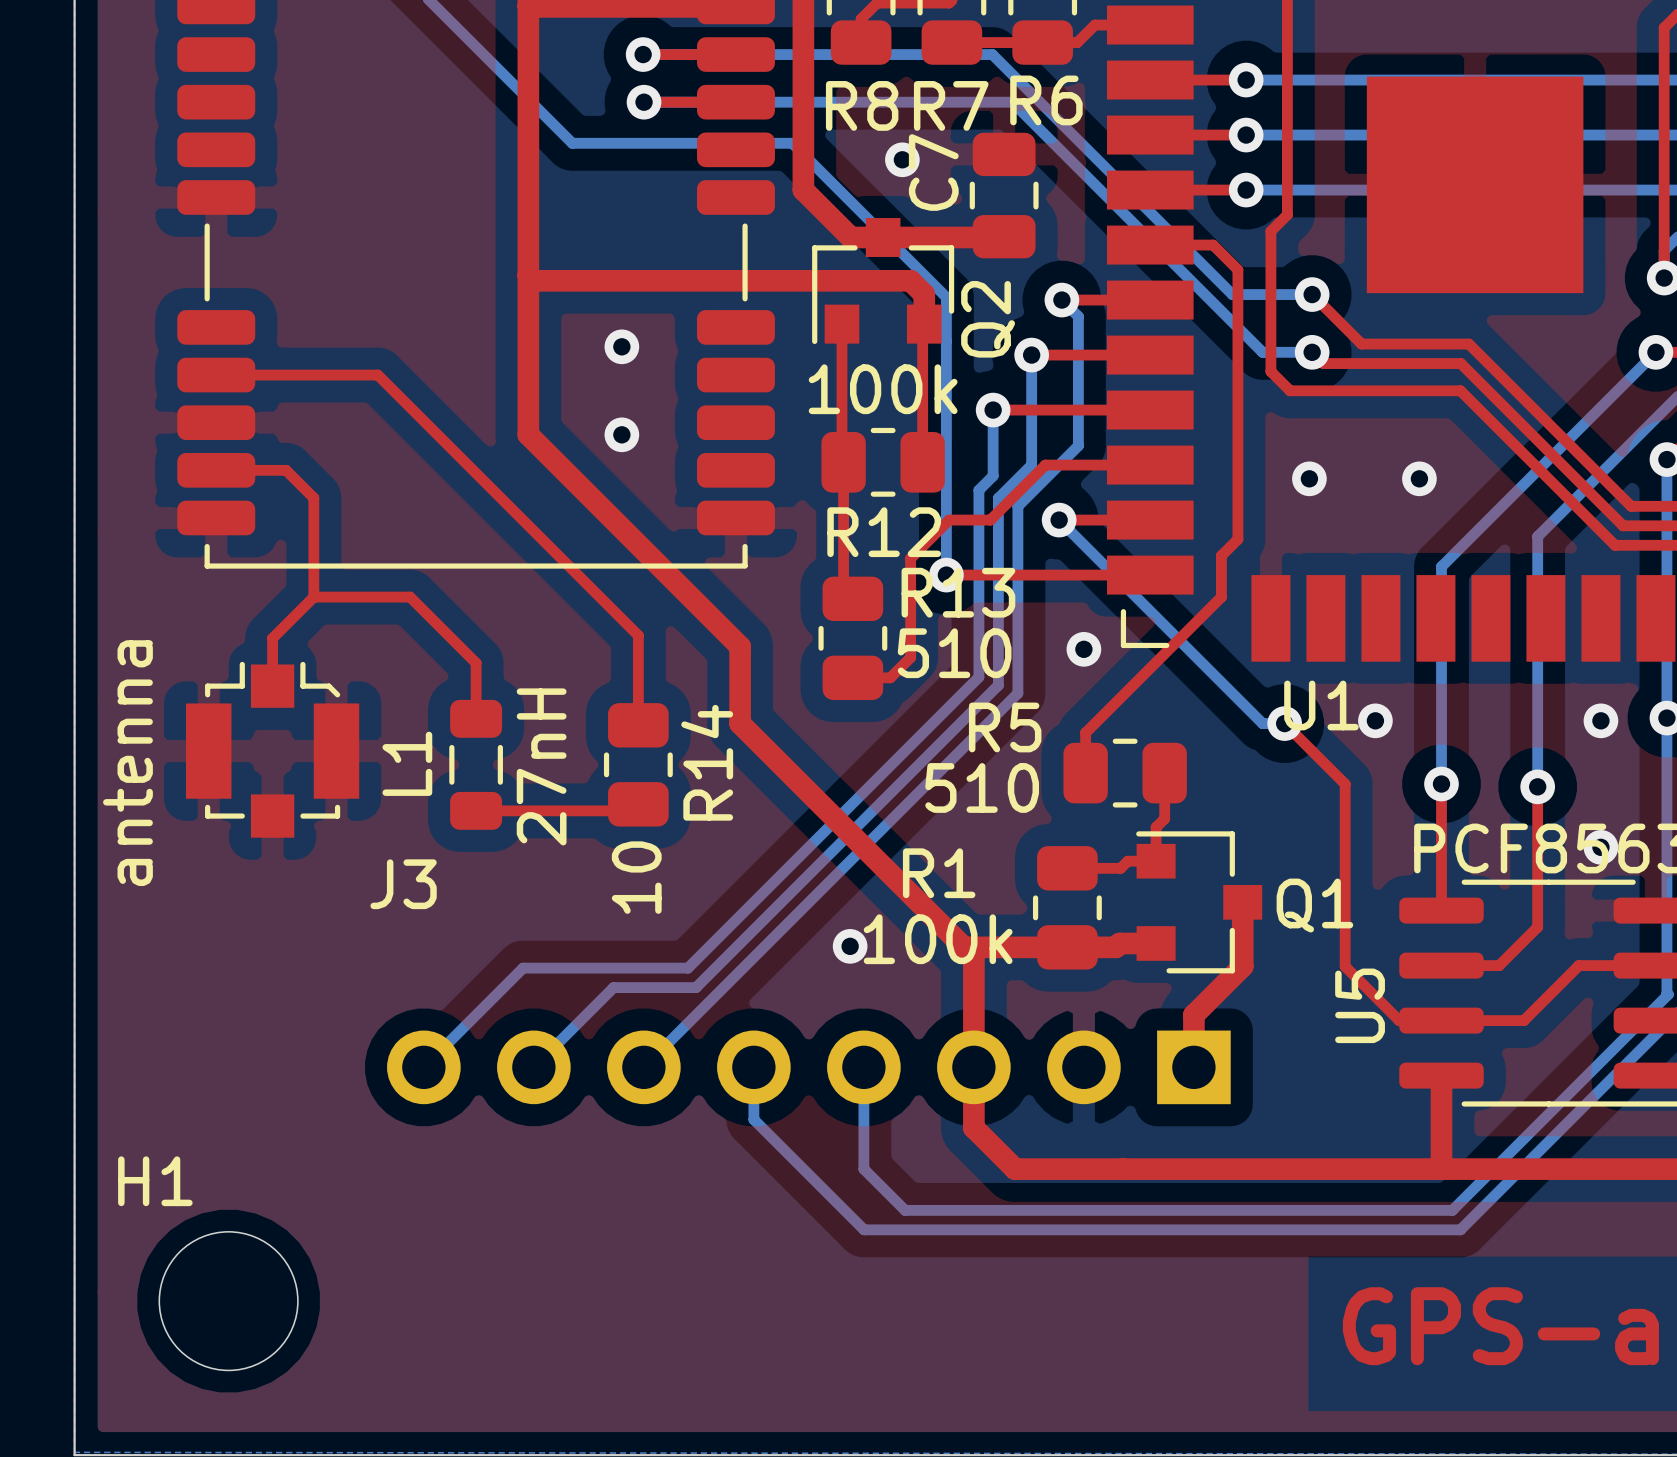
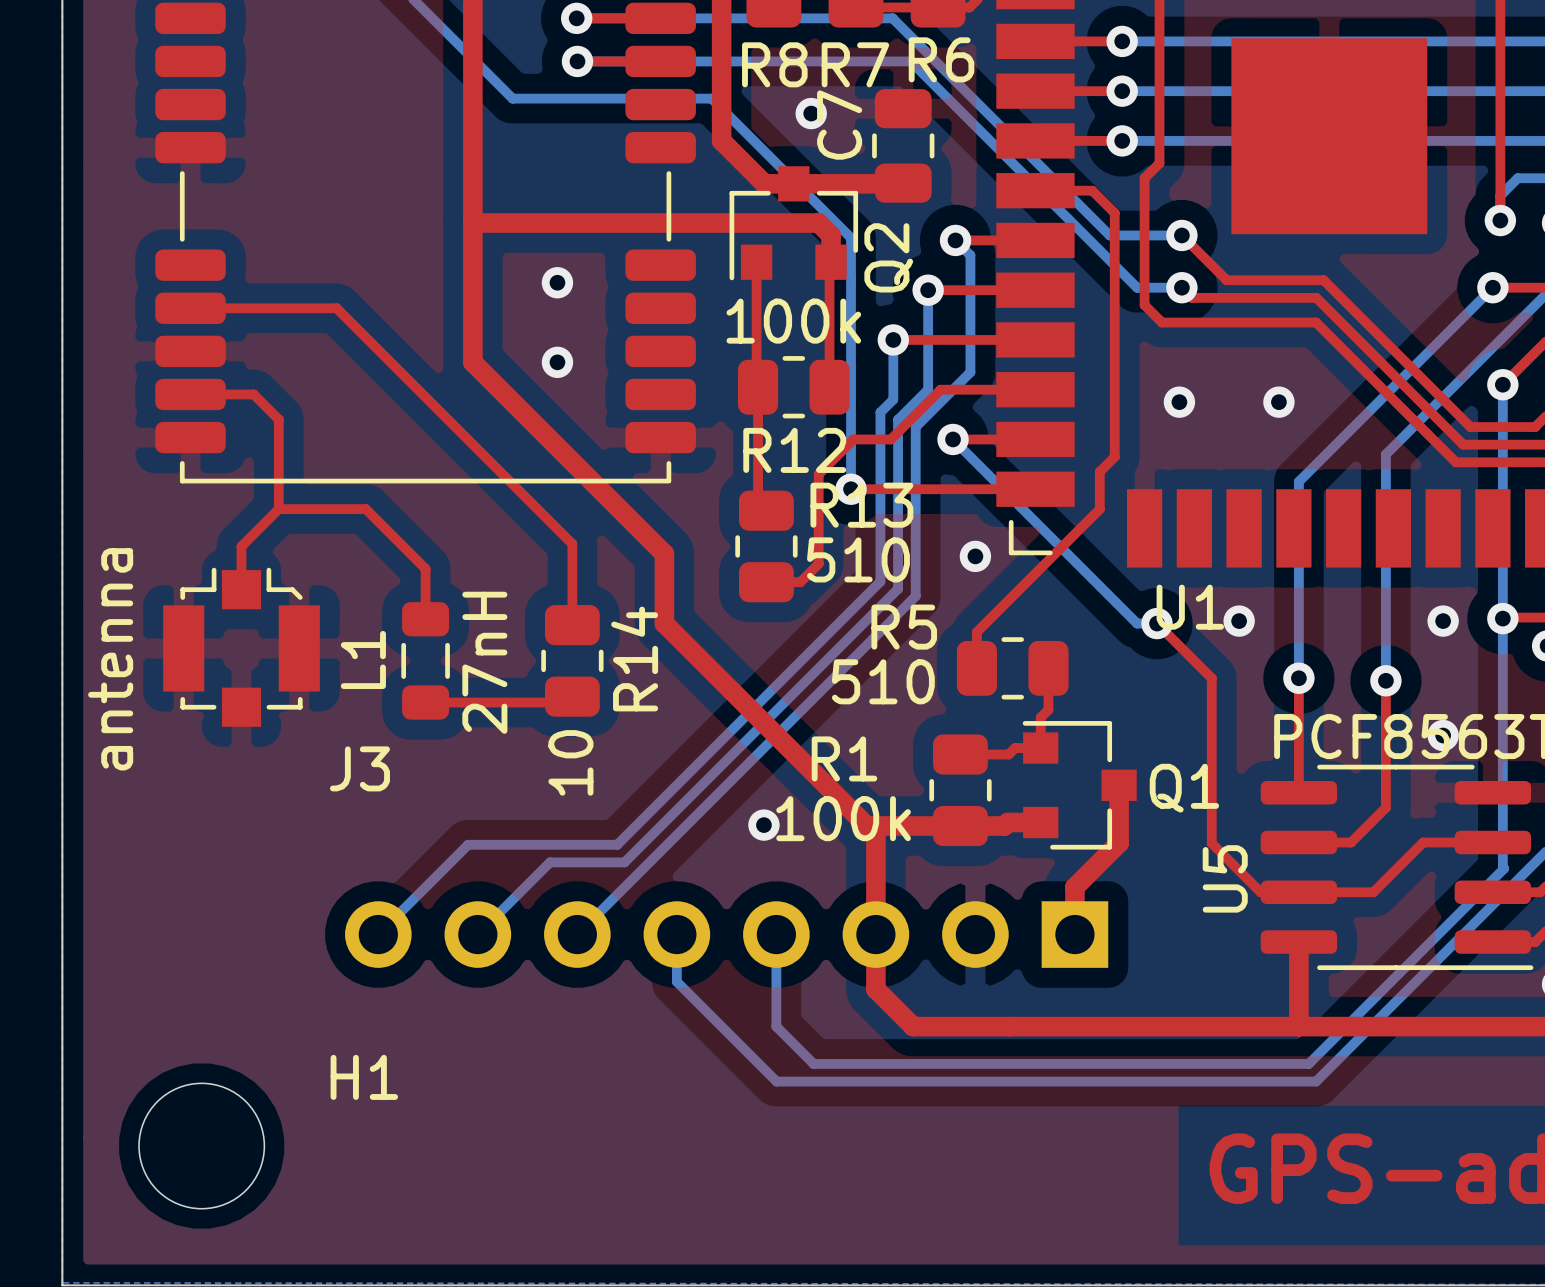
H1 name position: H1 (155, 1181) -> H1 (364, 1077)

